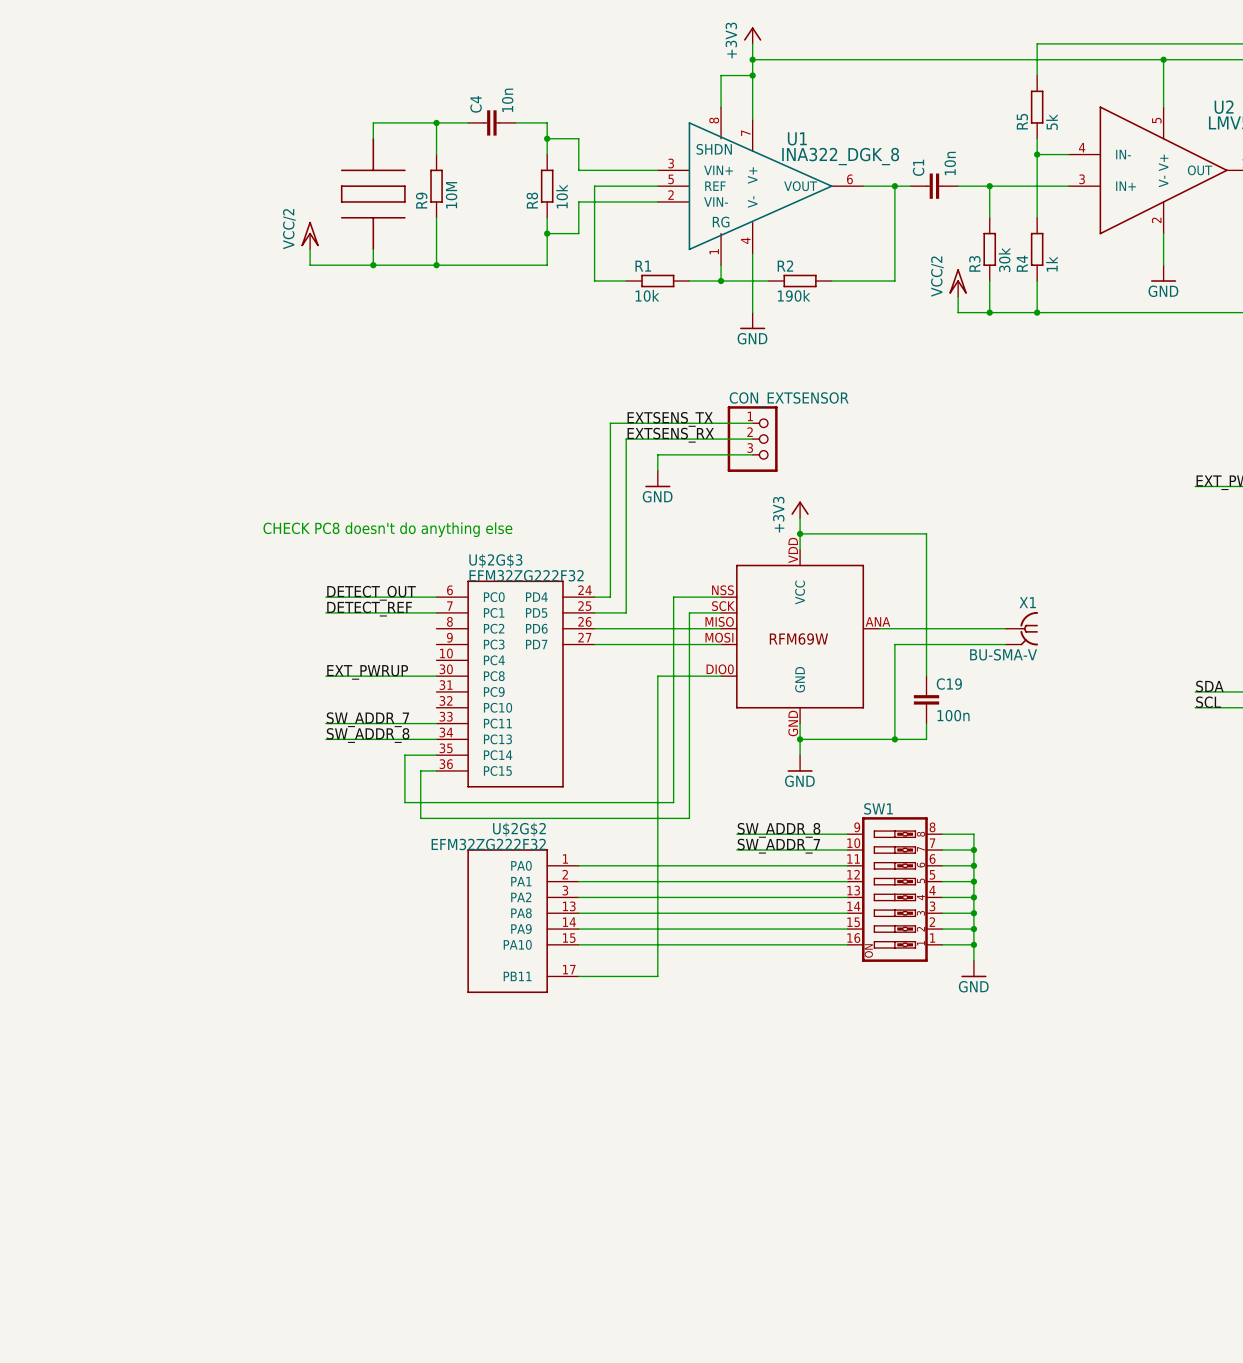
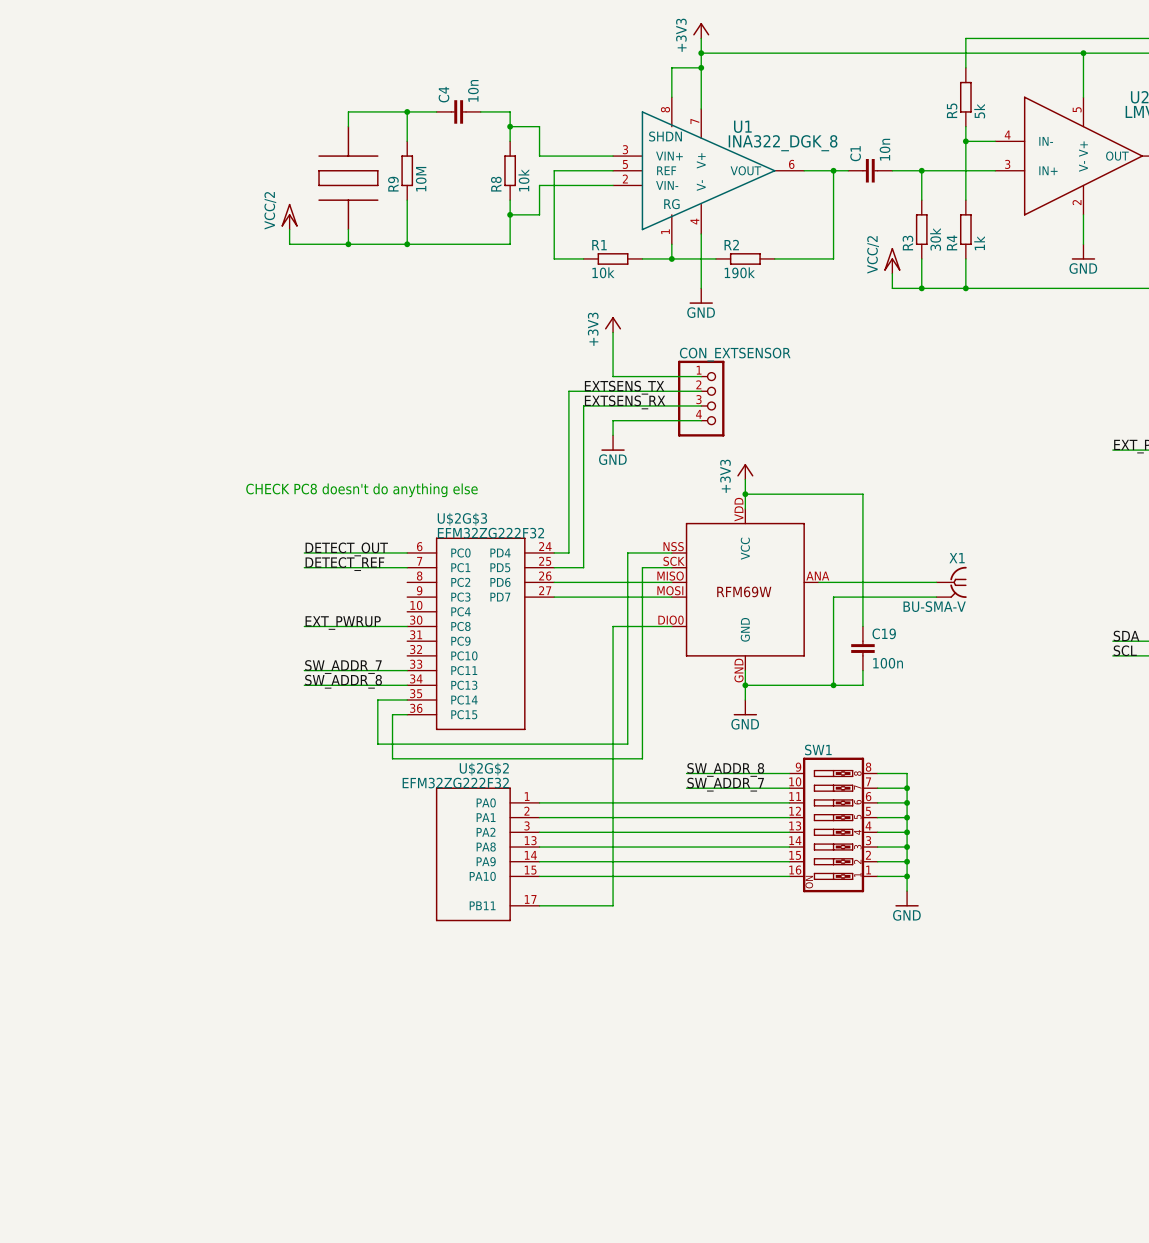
power symbol: none -> +3V3 (613, 324)
wire: none -> (613, 332) (613, 376) (701, 376)
CON_EXTSENSOR: none -> (701, 398)
CON_EXTSENSOR: (752, 439) -> none

